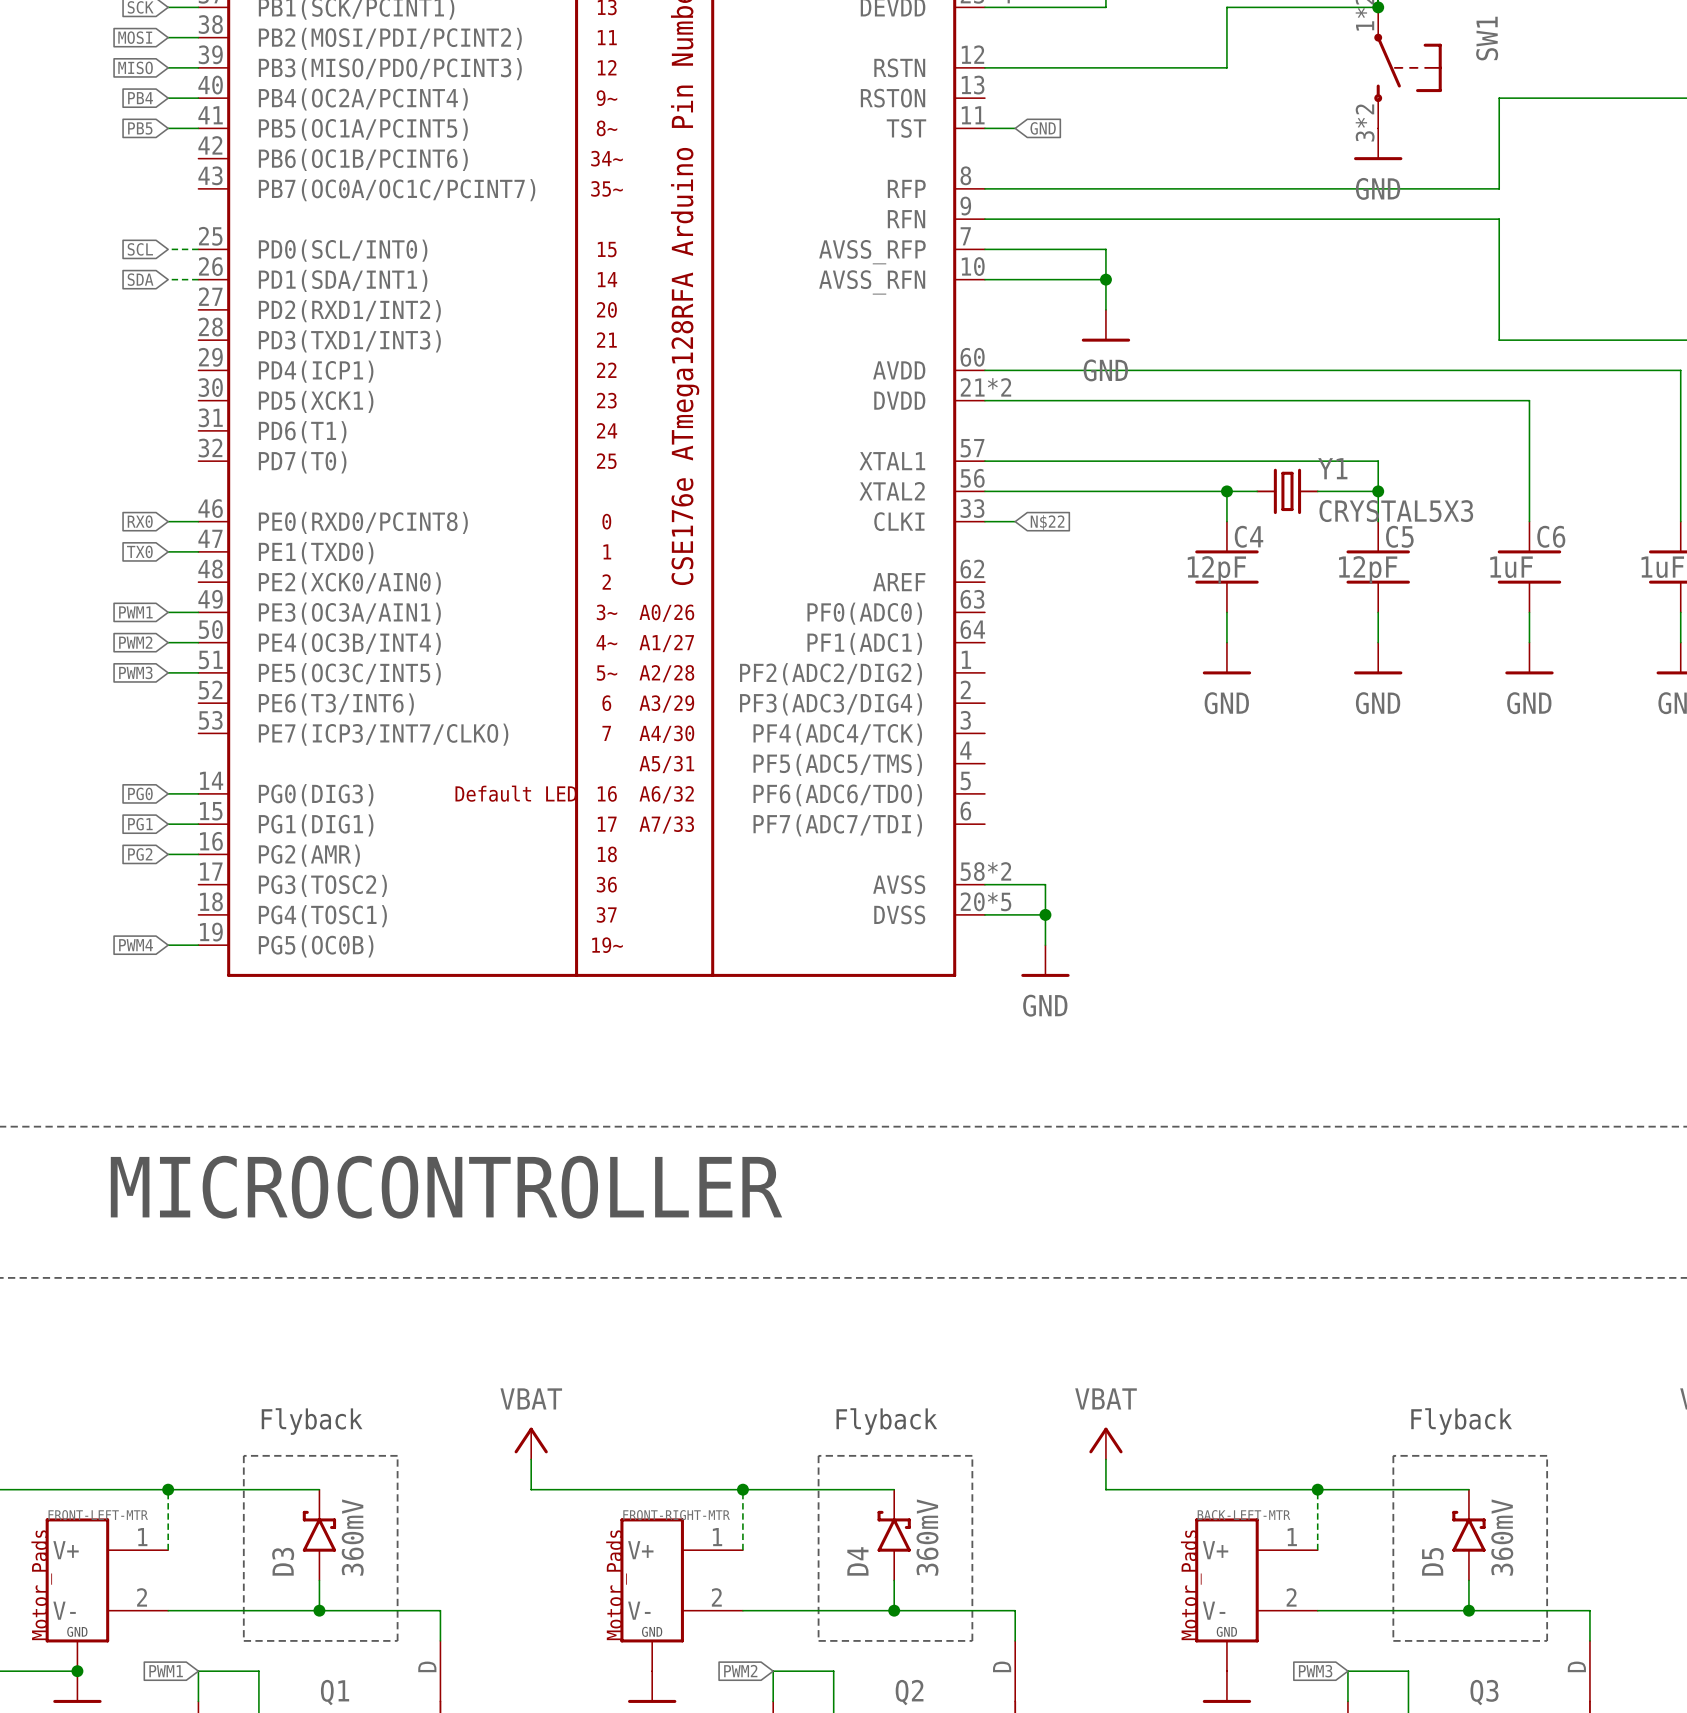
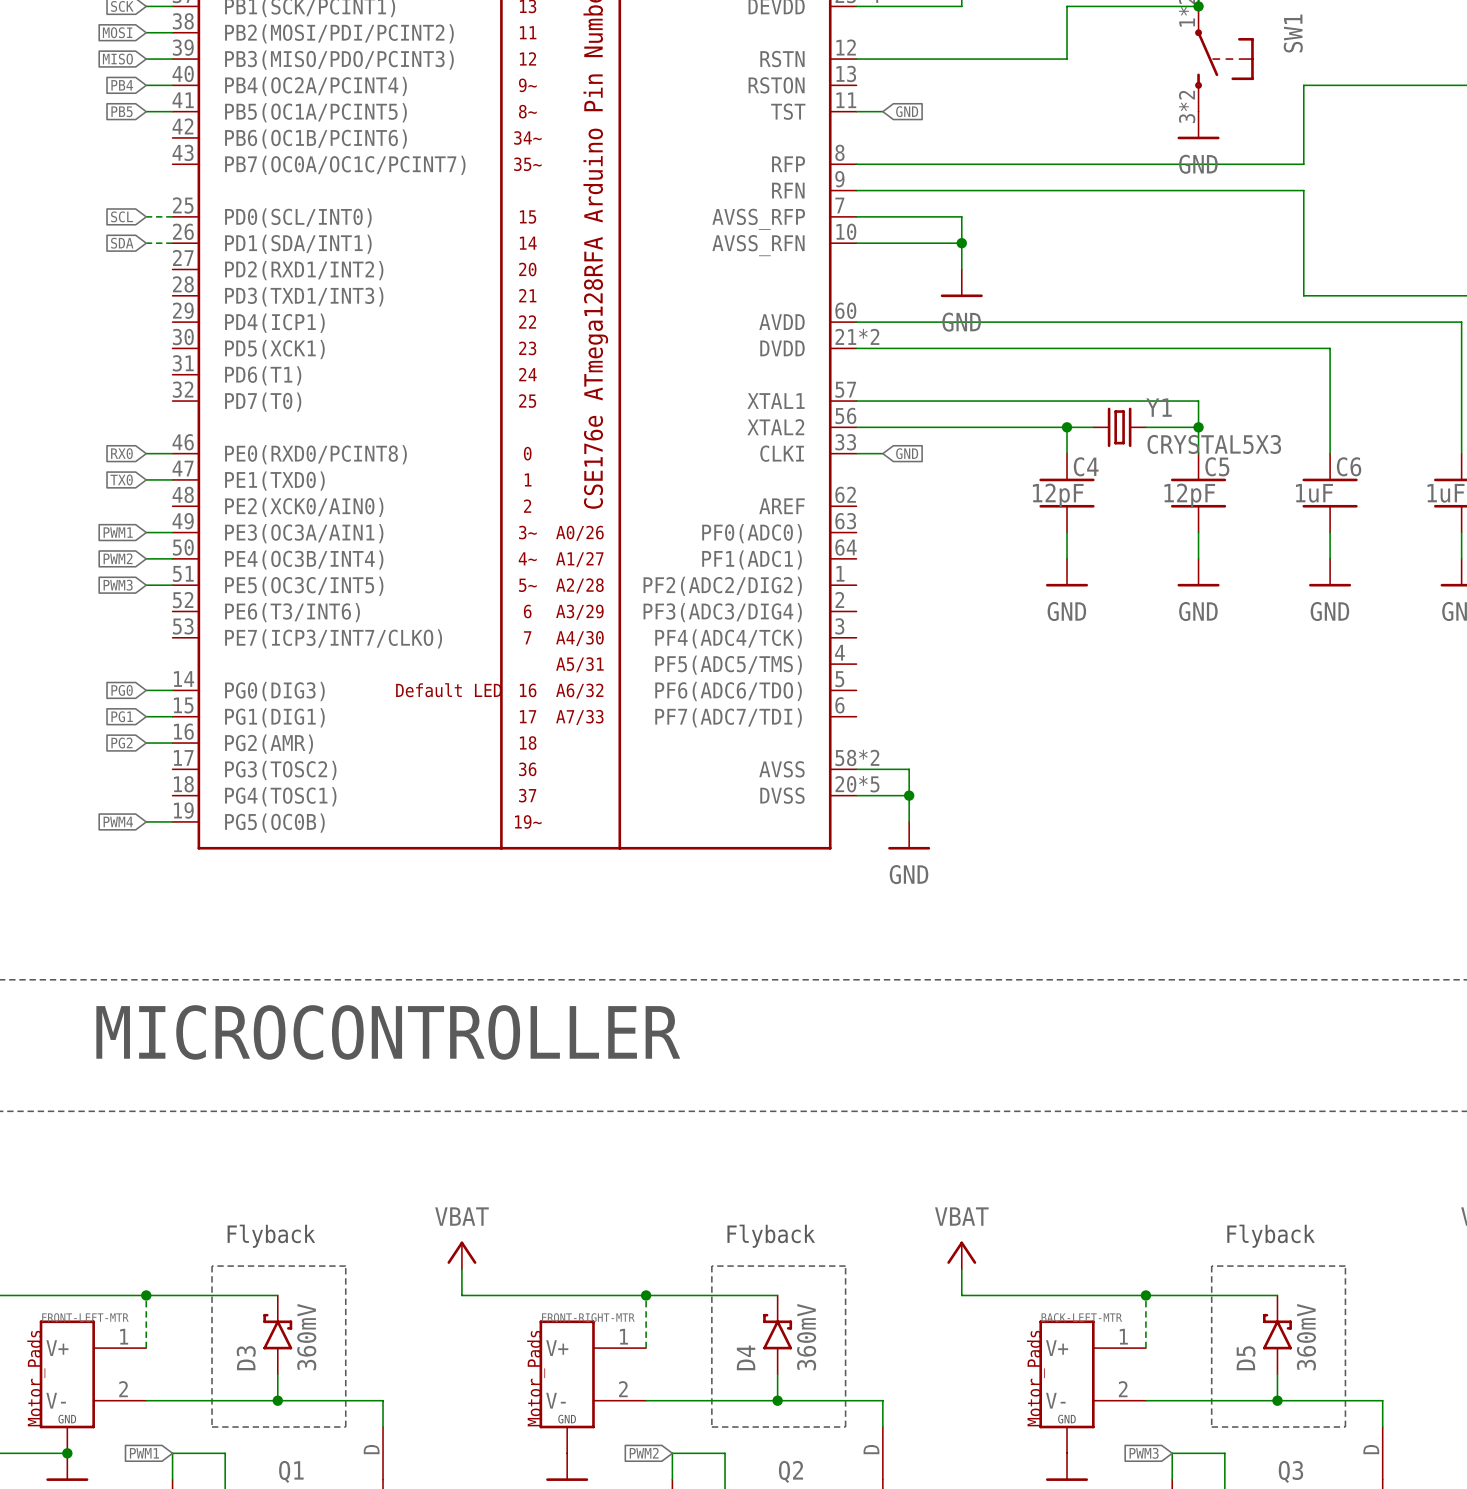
global label: N$22 (1047, 522) -> GND (907, 453)

